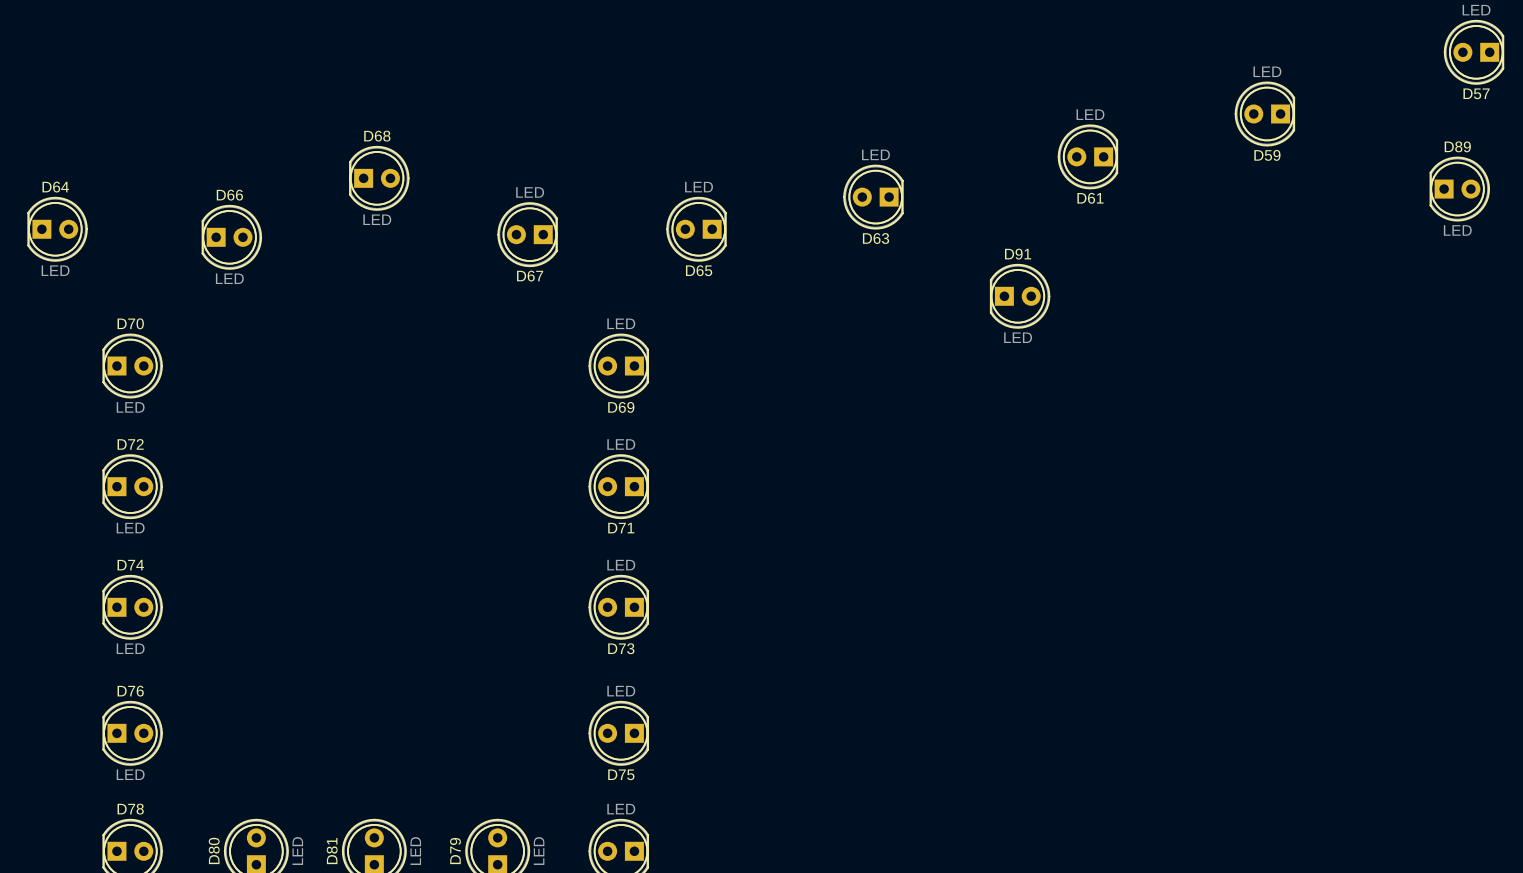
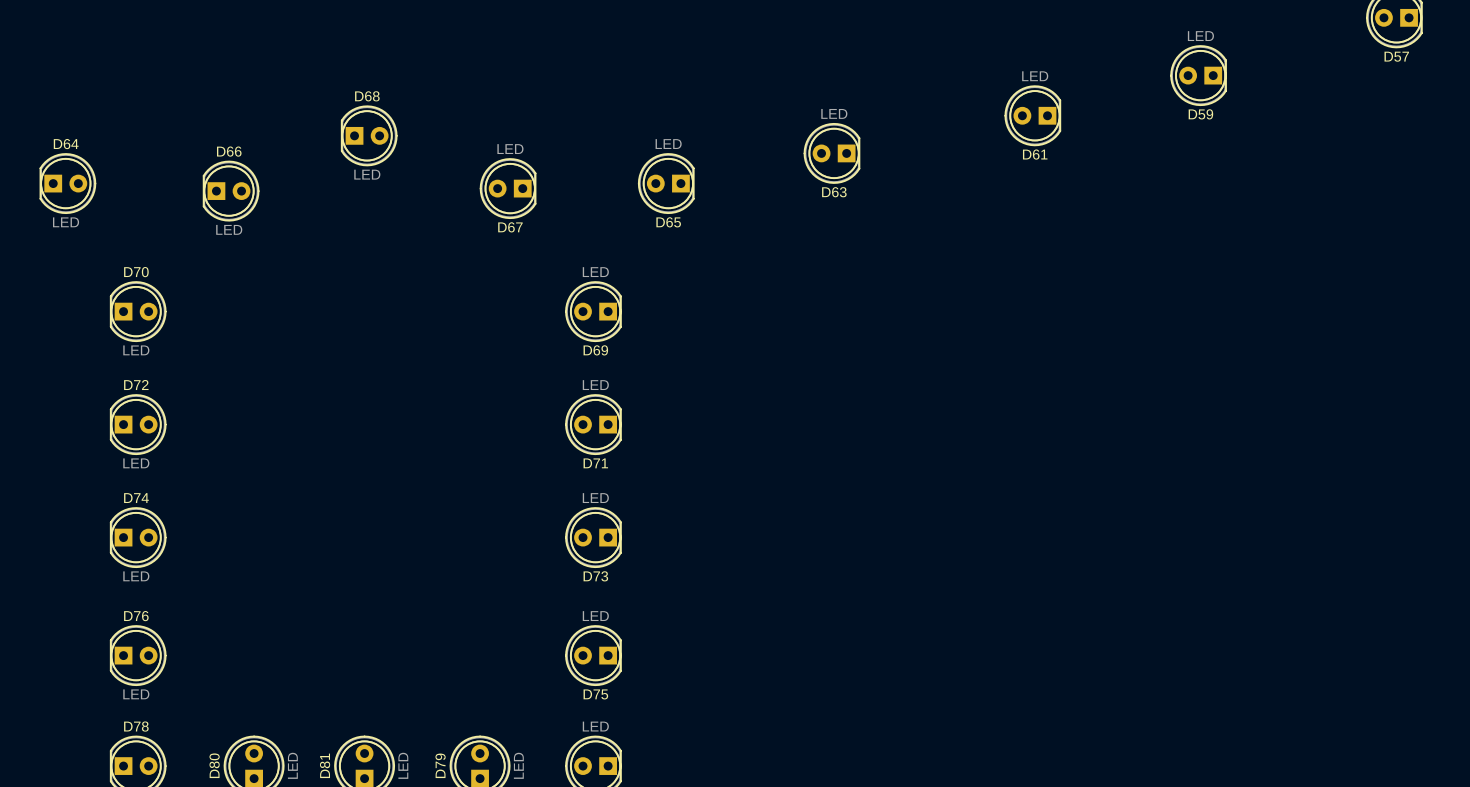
D89: LED (1459, 189) -> none
D91: LED (1020, 296) -> none

